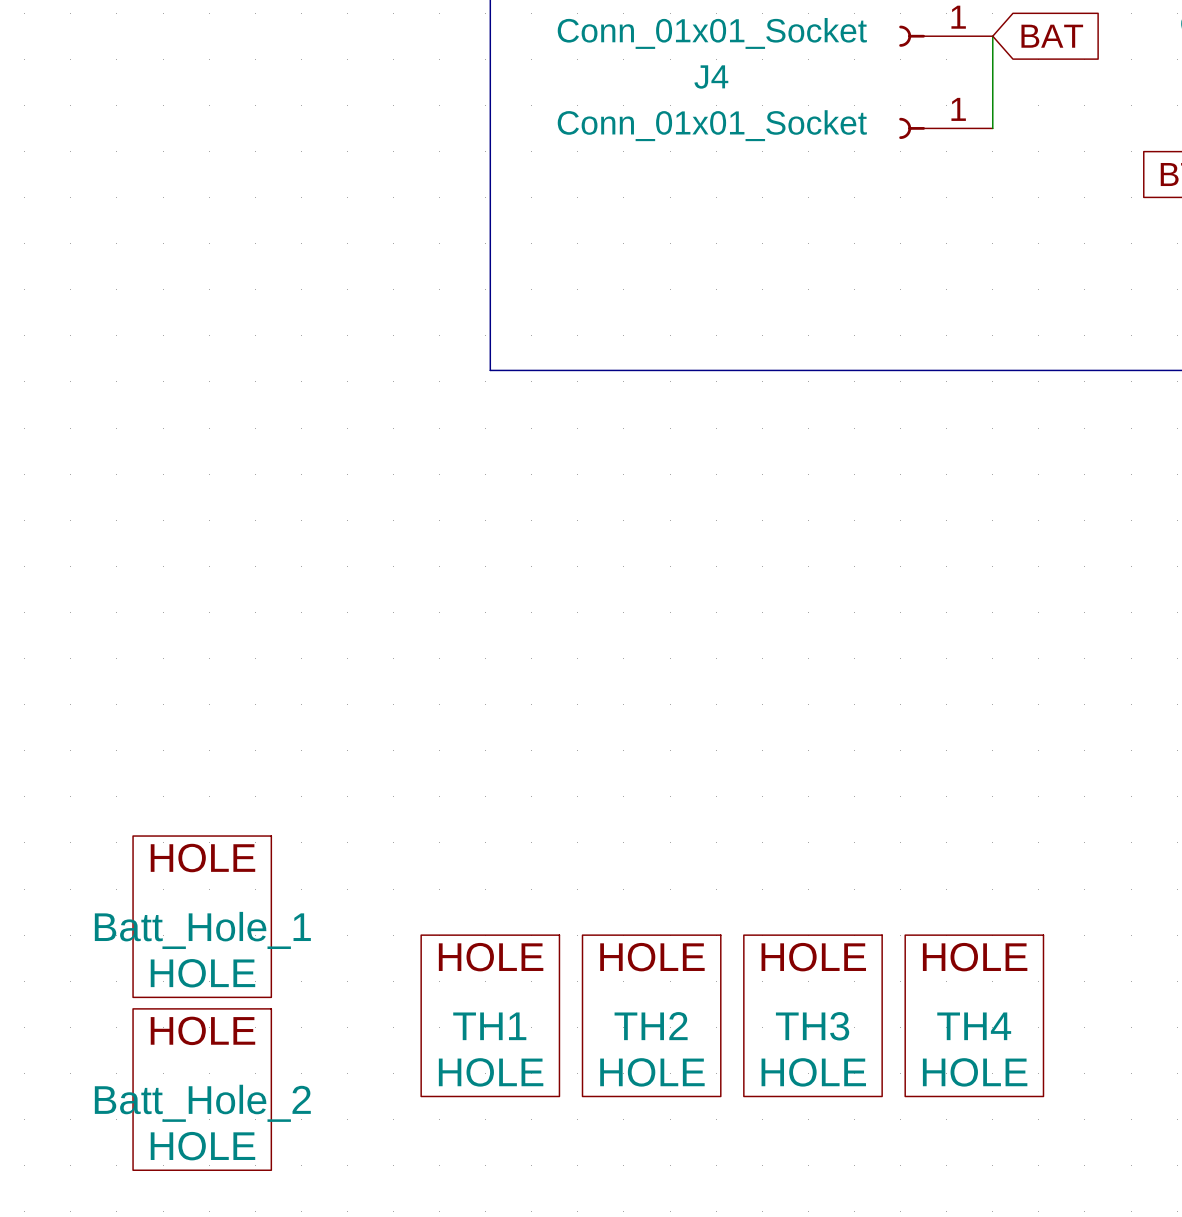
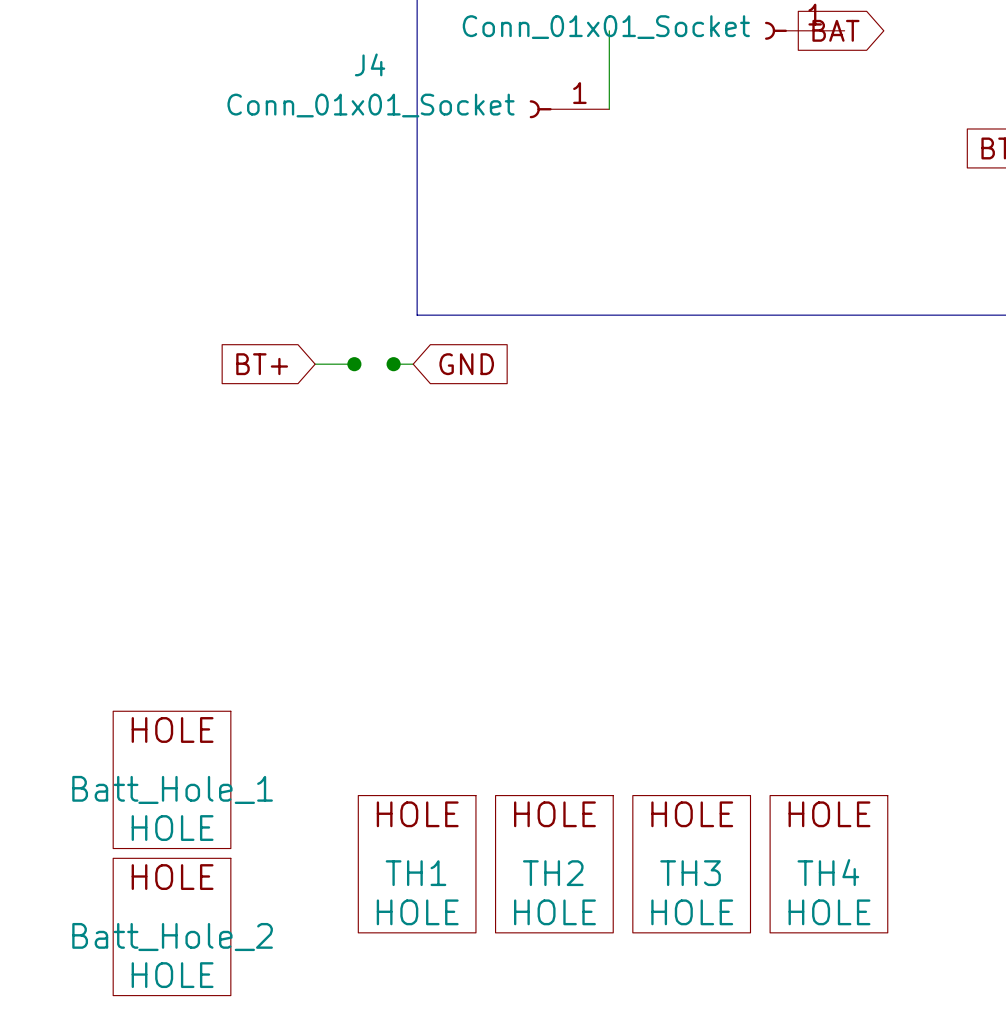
wire: (992, 36) (992, 128) -> (609, 30) (609, 109)
global label rotation: 0° (1052, 36) -> 180° (835, 30)
J4 position: (945, 128) -> (569, 109)
global label: none -> BT+ (262, 364)
wire: none -> (315, 364) (354, 364)
junction: none -> (354, 364)
wire: none -> (393, 364) (413, 364)
junction: none -> (393, 364)
global label: none -> GND (466, 364)

